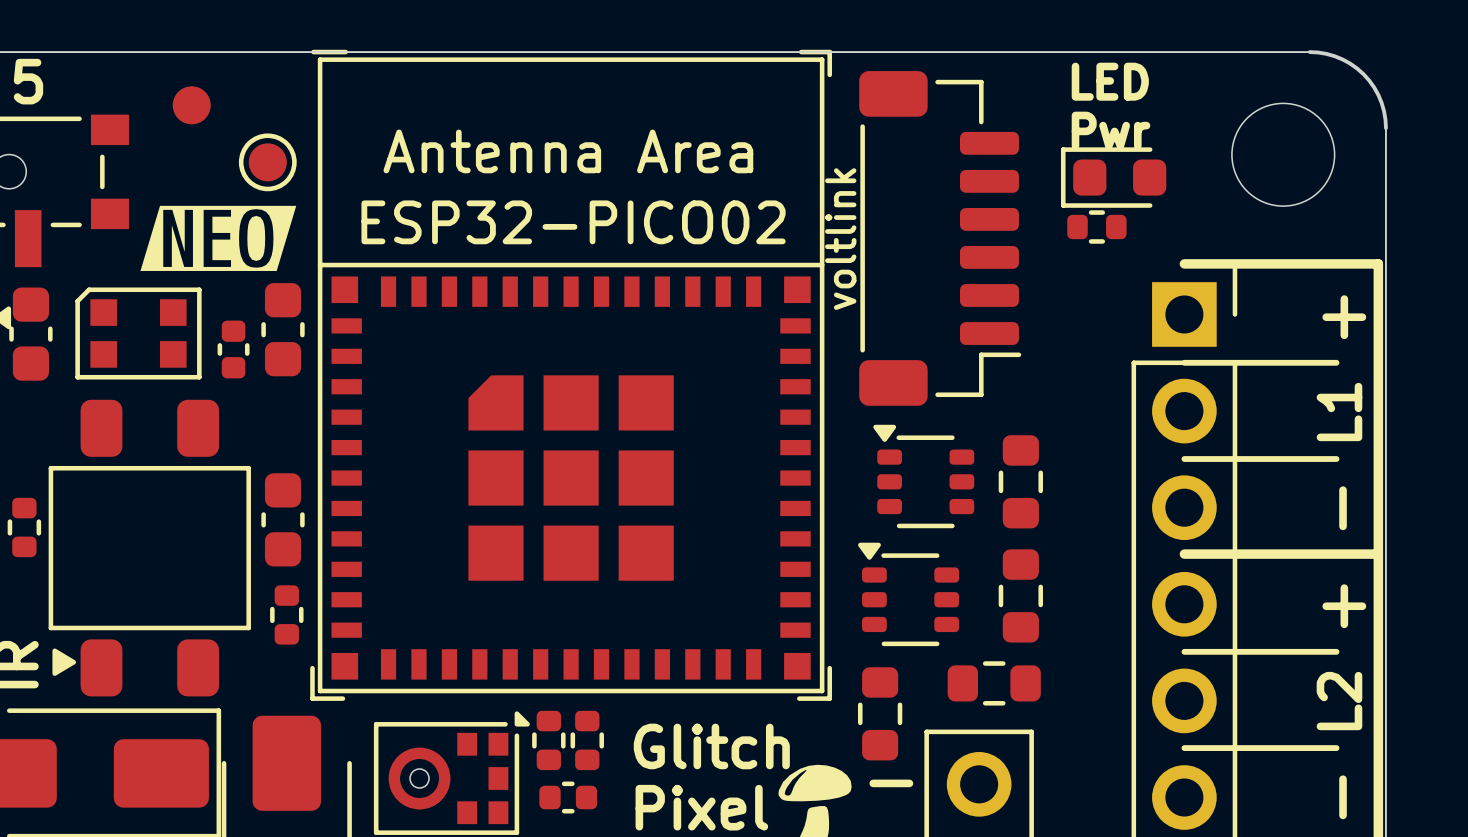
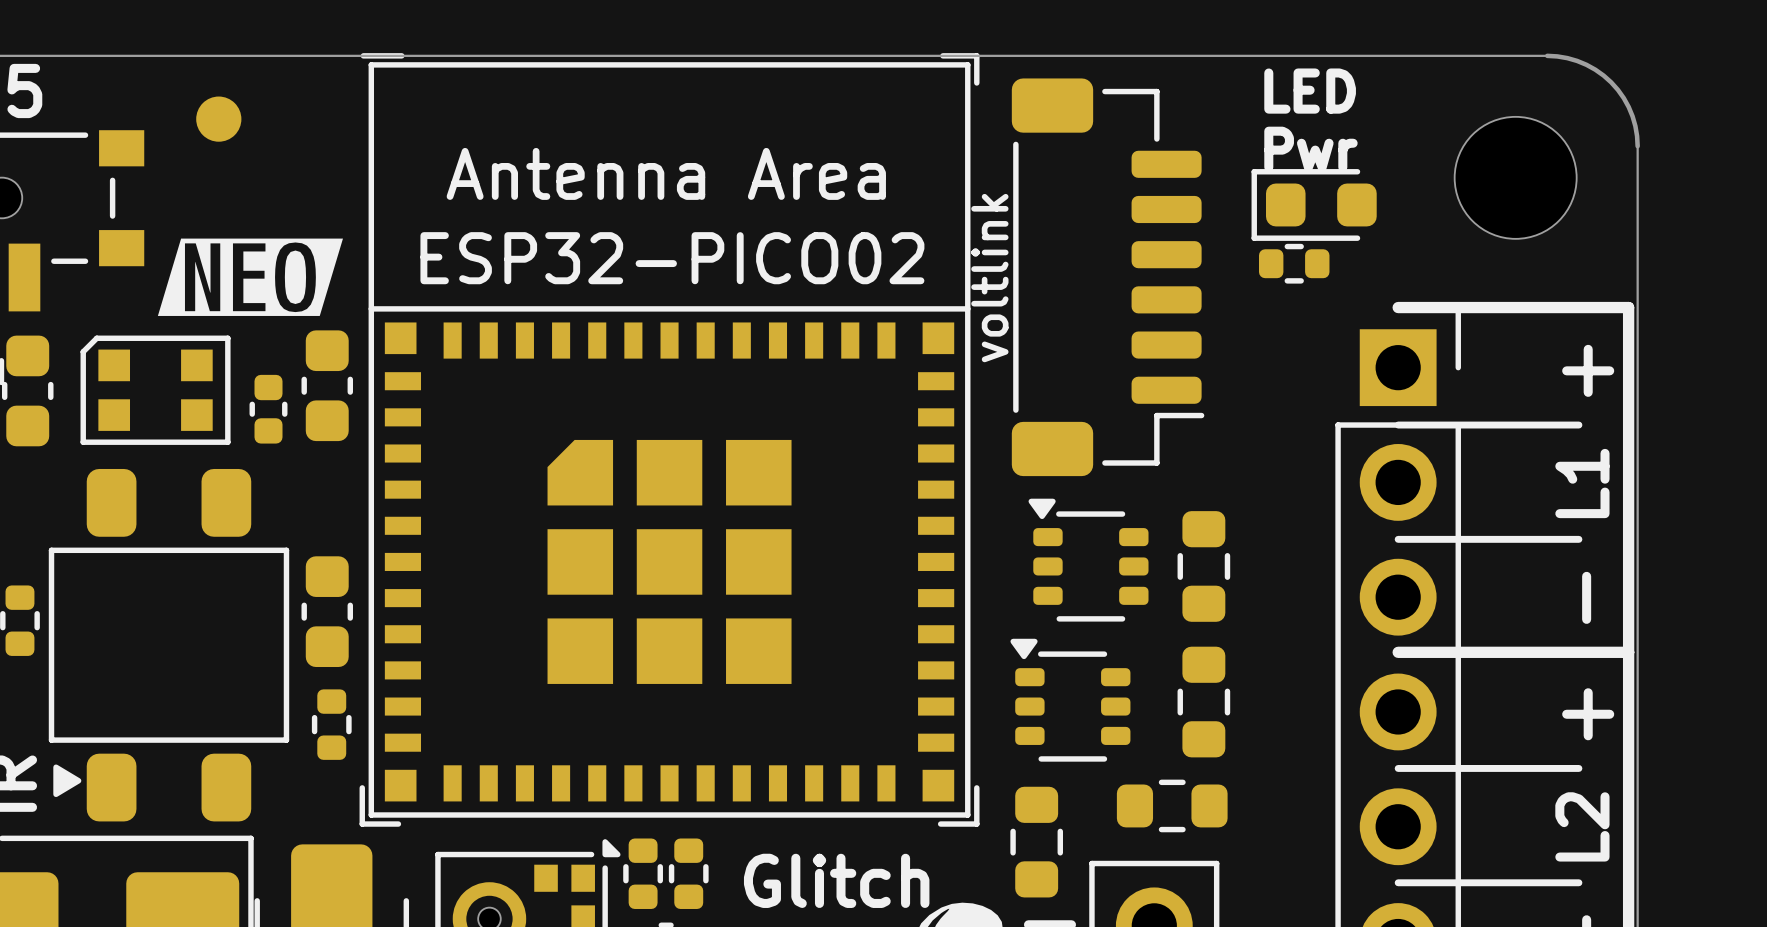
part: (267, 162) -> none

